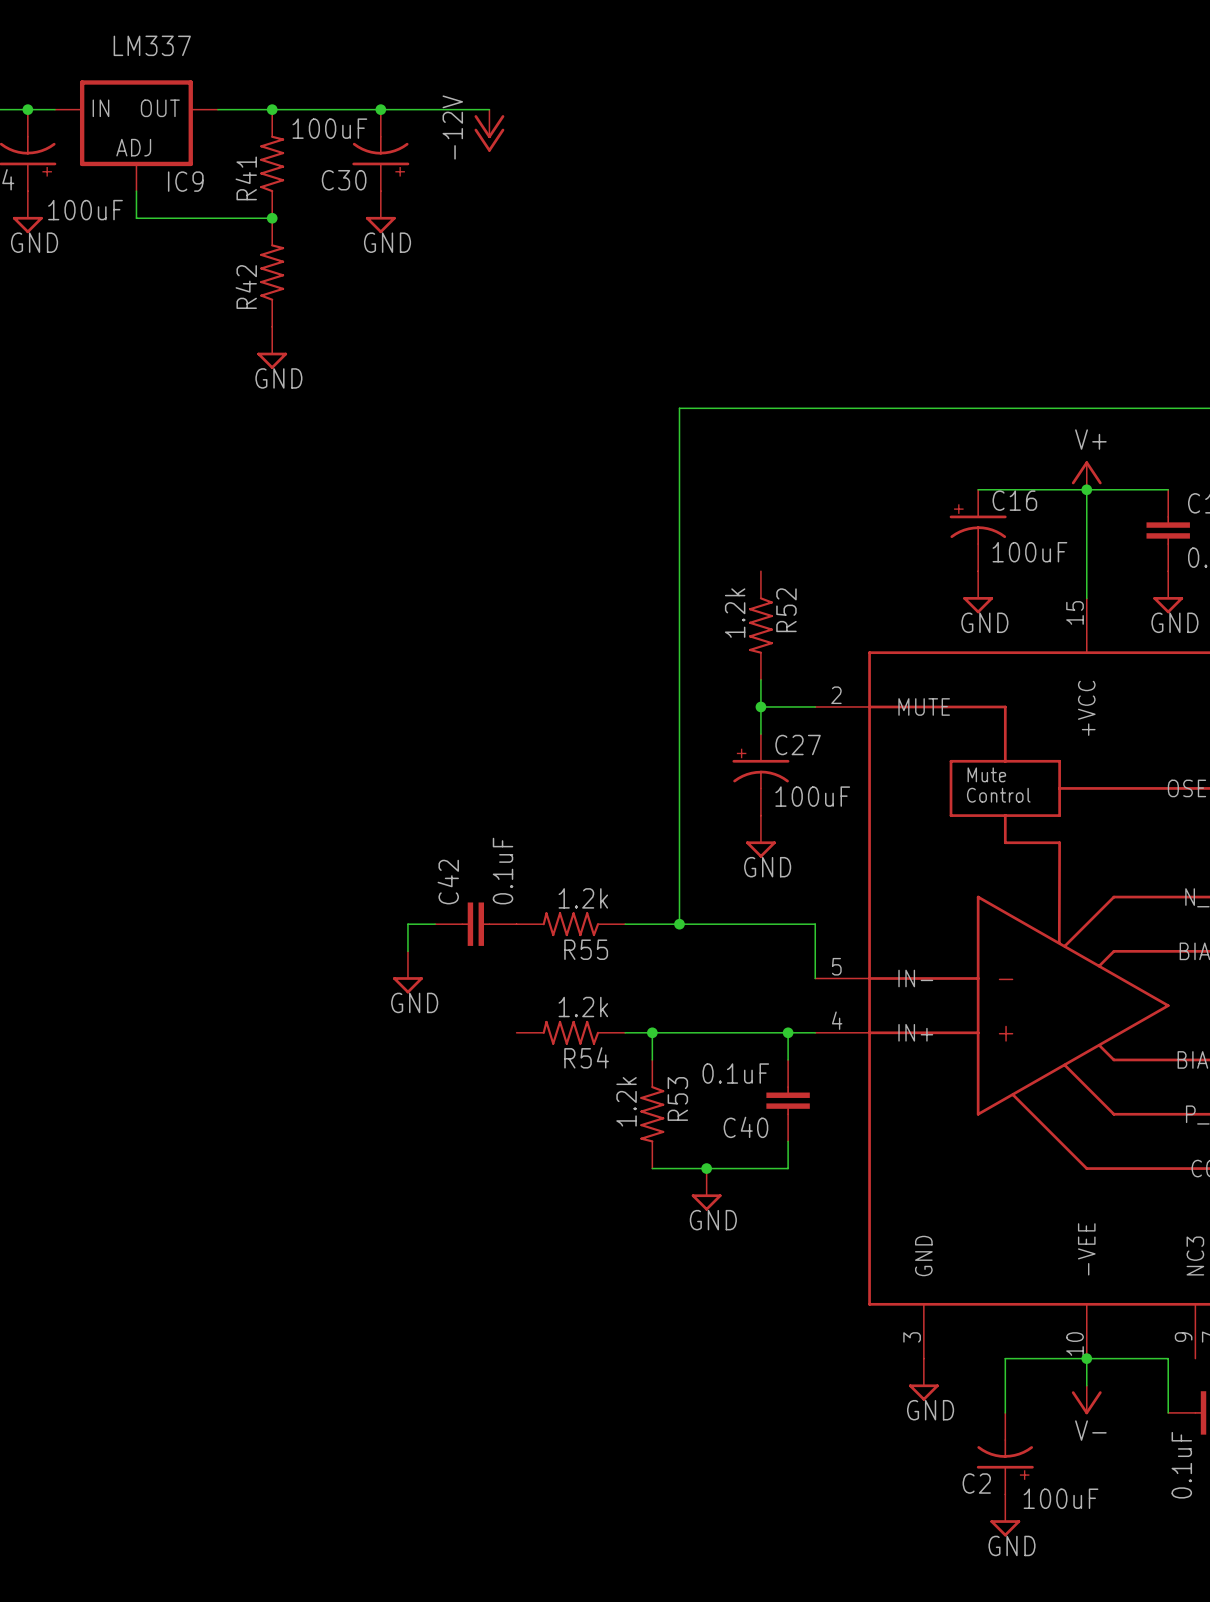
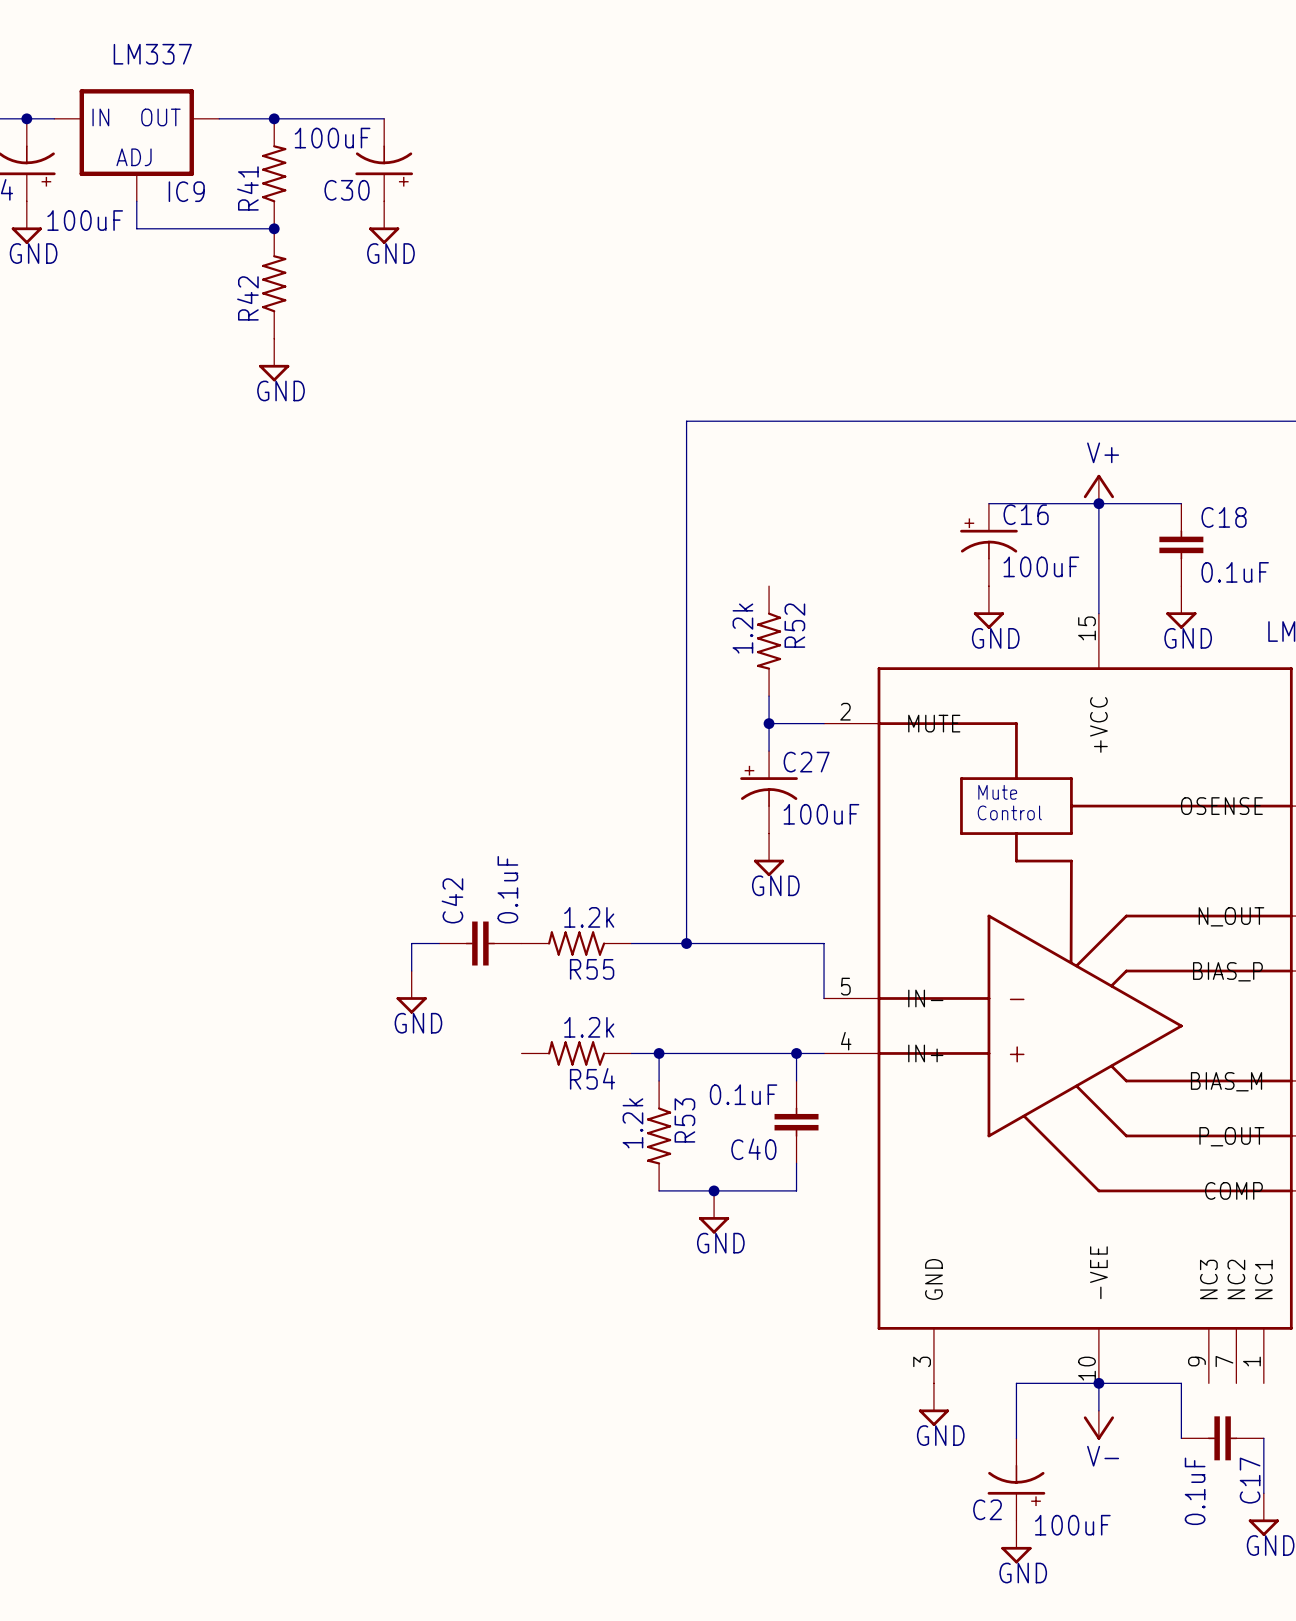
wire: (380, 109) (489, 109) -> none
junction: (380, 109) -> none
power symbol: -12V (489, 130) -> none

